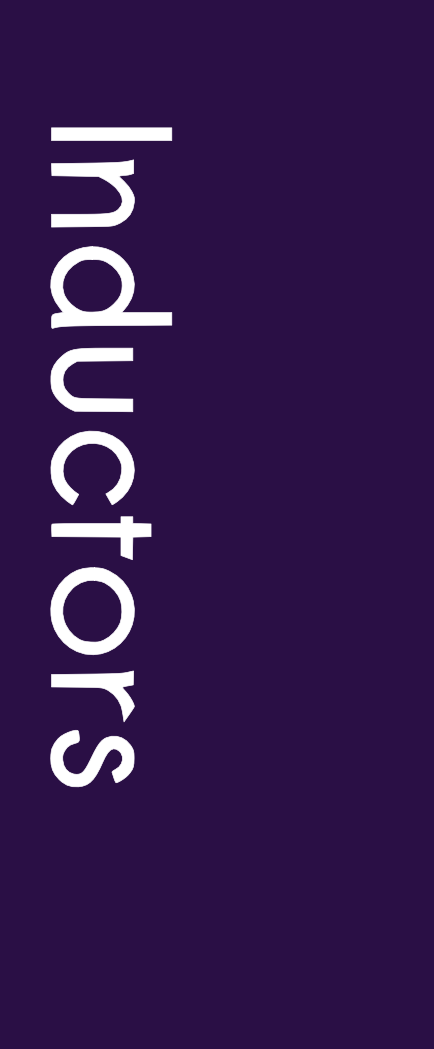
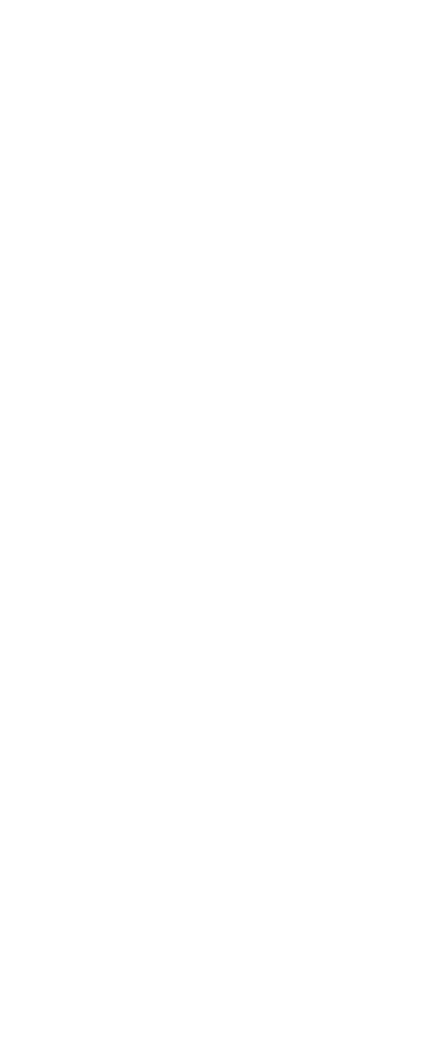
drawing: [50, 127, 173, 788] -> none

